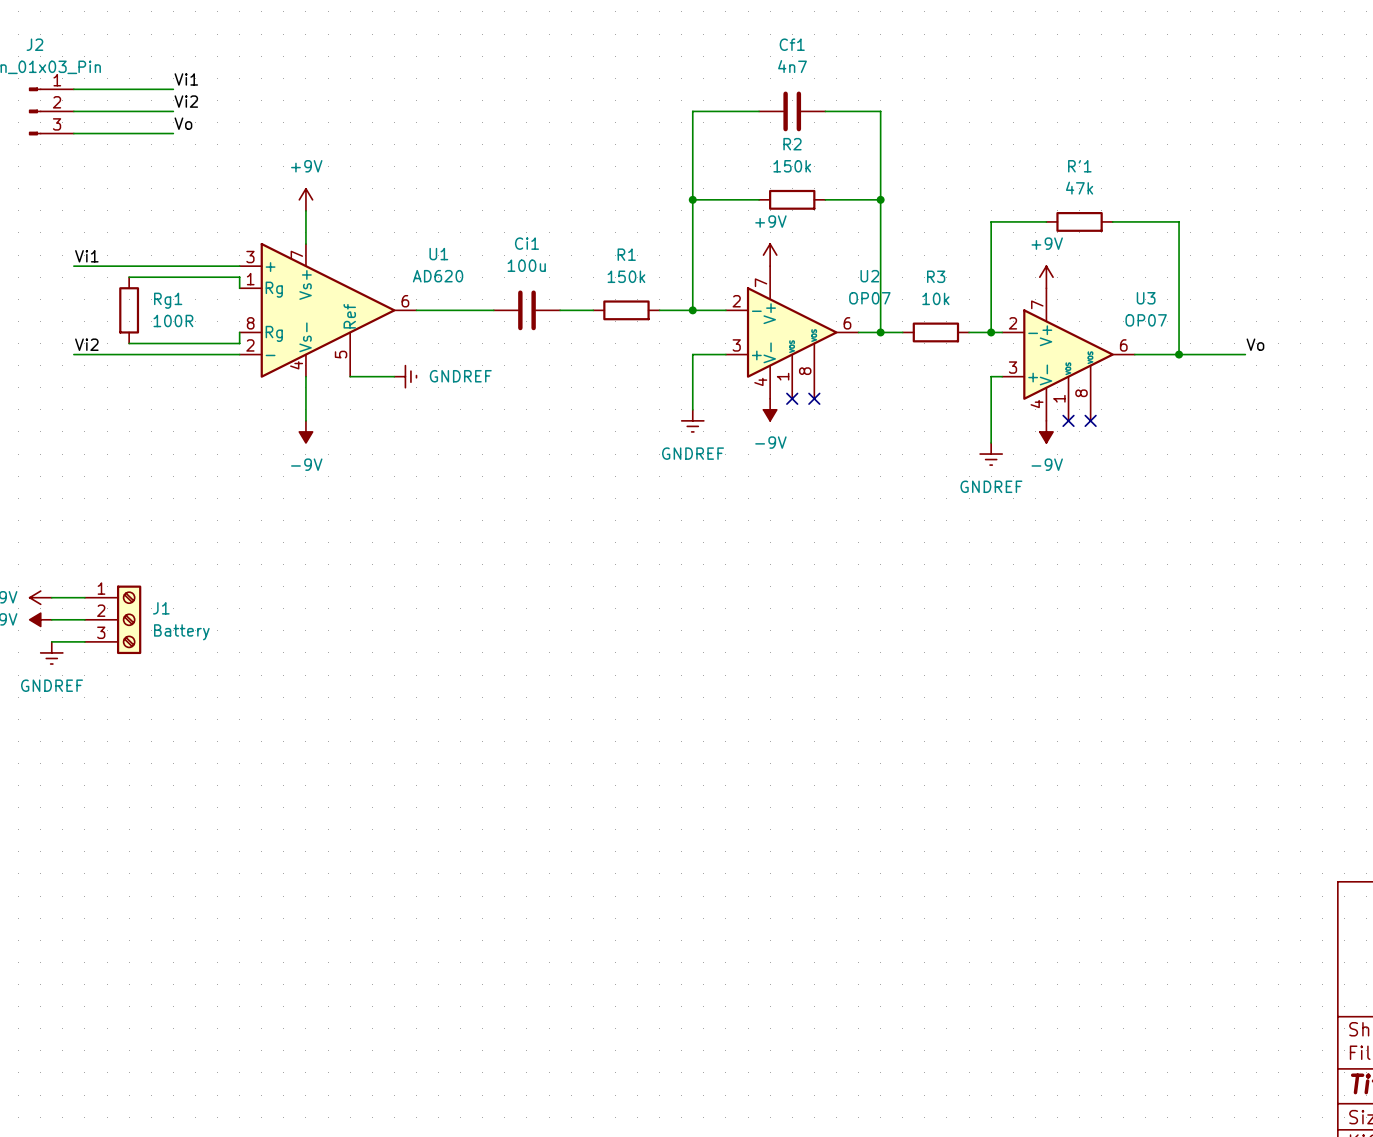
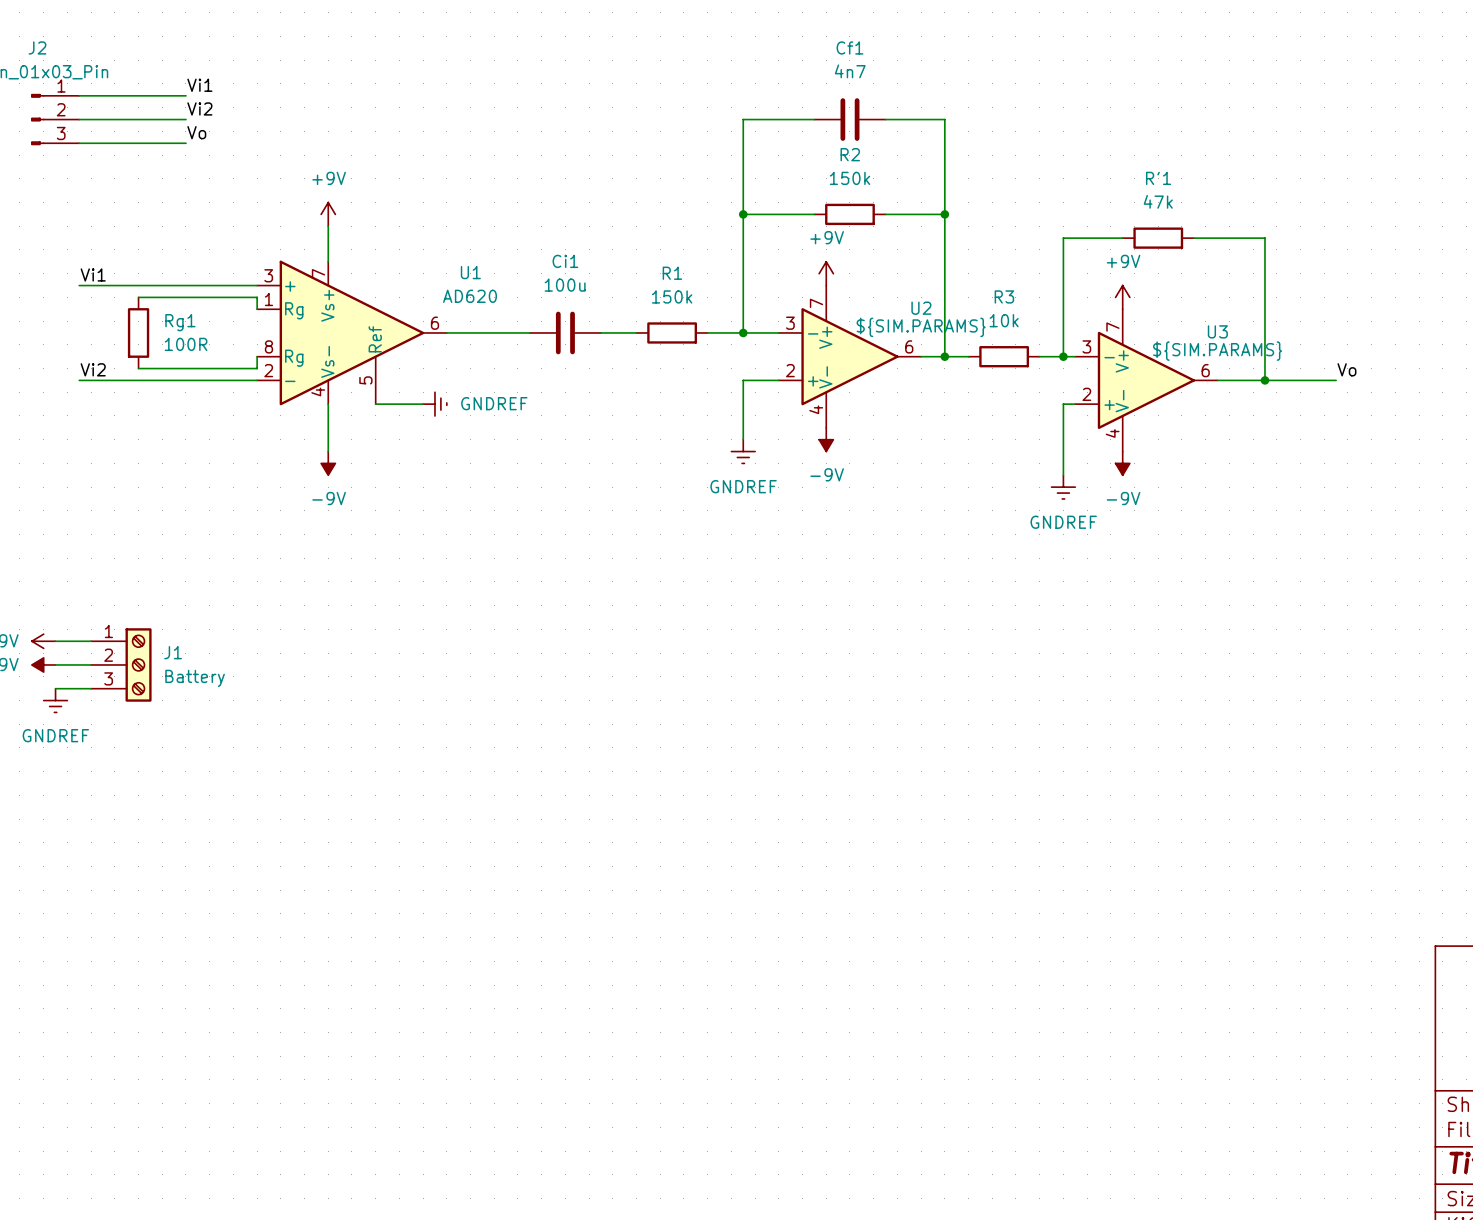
U2 symbol: [725, 266, 859, 399] -> [778, 285, 922, 428]
U3 symbol: [1002, 288, 1135, 421] -> [1075, 309, 1218, 452]
U2 value: OP07 (869, 298) -> ${SIM.PARAMS} (921, 327)
U3 value: OP07 (1146, 320) -> ${SIM.PARAMS} (1217, 351)
no-connect mark: (792, 398) -> none
no-connect mark: (814, 398) -> none
no-connect mark: (1068, 420) -> none
no-connect mark: (1090, 420) -> none

